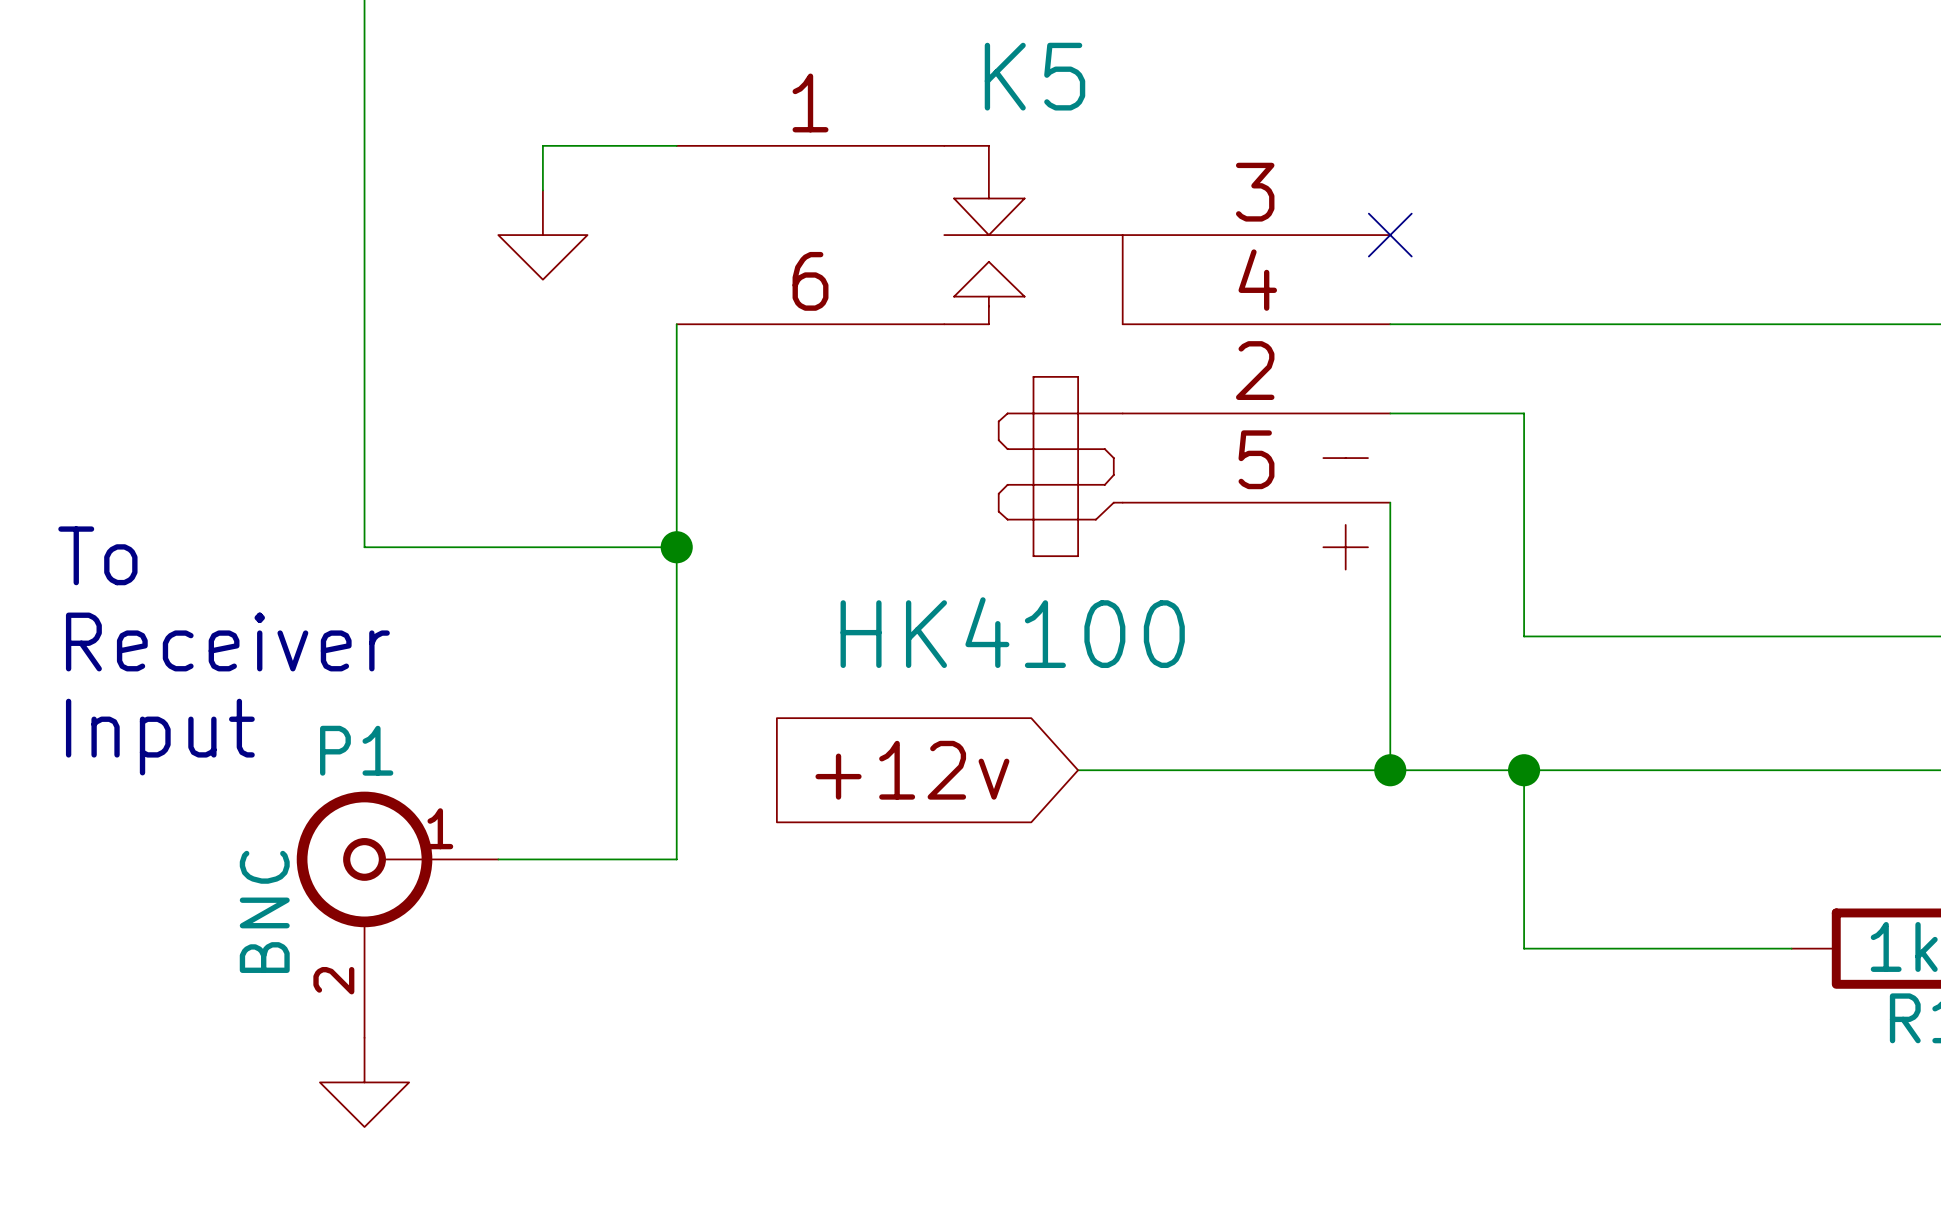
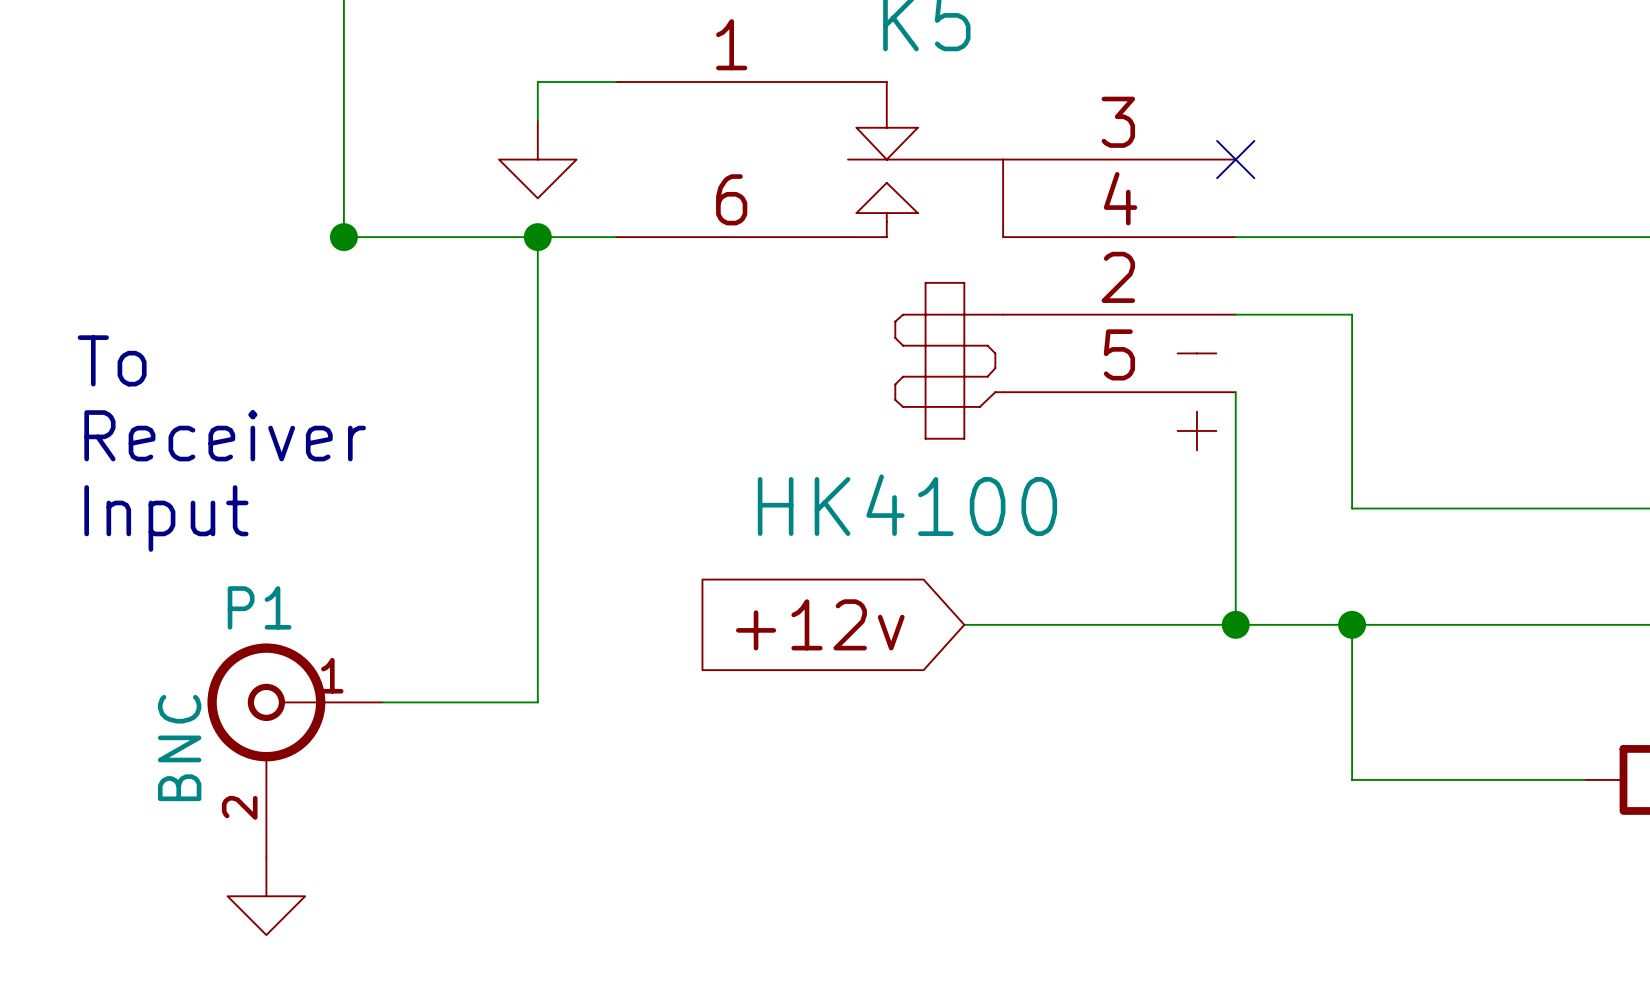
wire: (587, 145) (542, 145) (542, 190) -> (537, 82) (537, 120)
power symbol position: (542, 235) -> (537, 159)
wire: (364, 324) (364, 547) (676, 547) -> (343, 237) (615, 237)
junction: none -> (343, 237)
junction: none -> (537, 237)
wire: (676, 324) (676, 859) (587, 859) -> (537, 237) (537, 702)
text: none -> To (112, 360)
junction: (676, 547) -> none
text: To (97, 555) -> Receiver (225, 435)
text: Receiver (227, 641) -> Input (166, 518)
text: Input (160, 737) -> none
P1 position: (397, 914) -> (295, 750)
power symbol position: (364, 1082) -> (266, 896)

